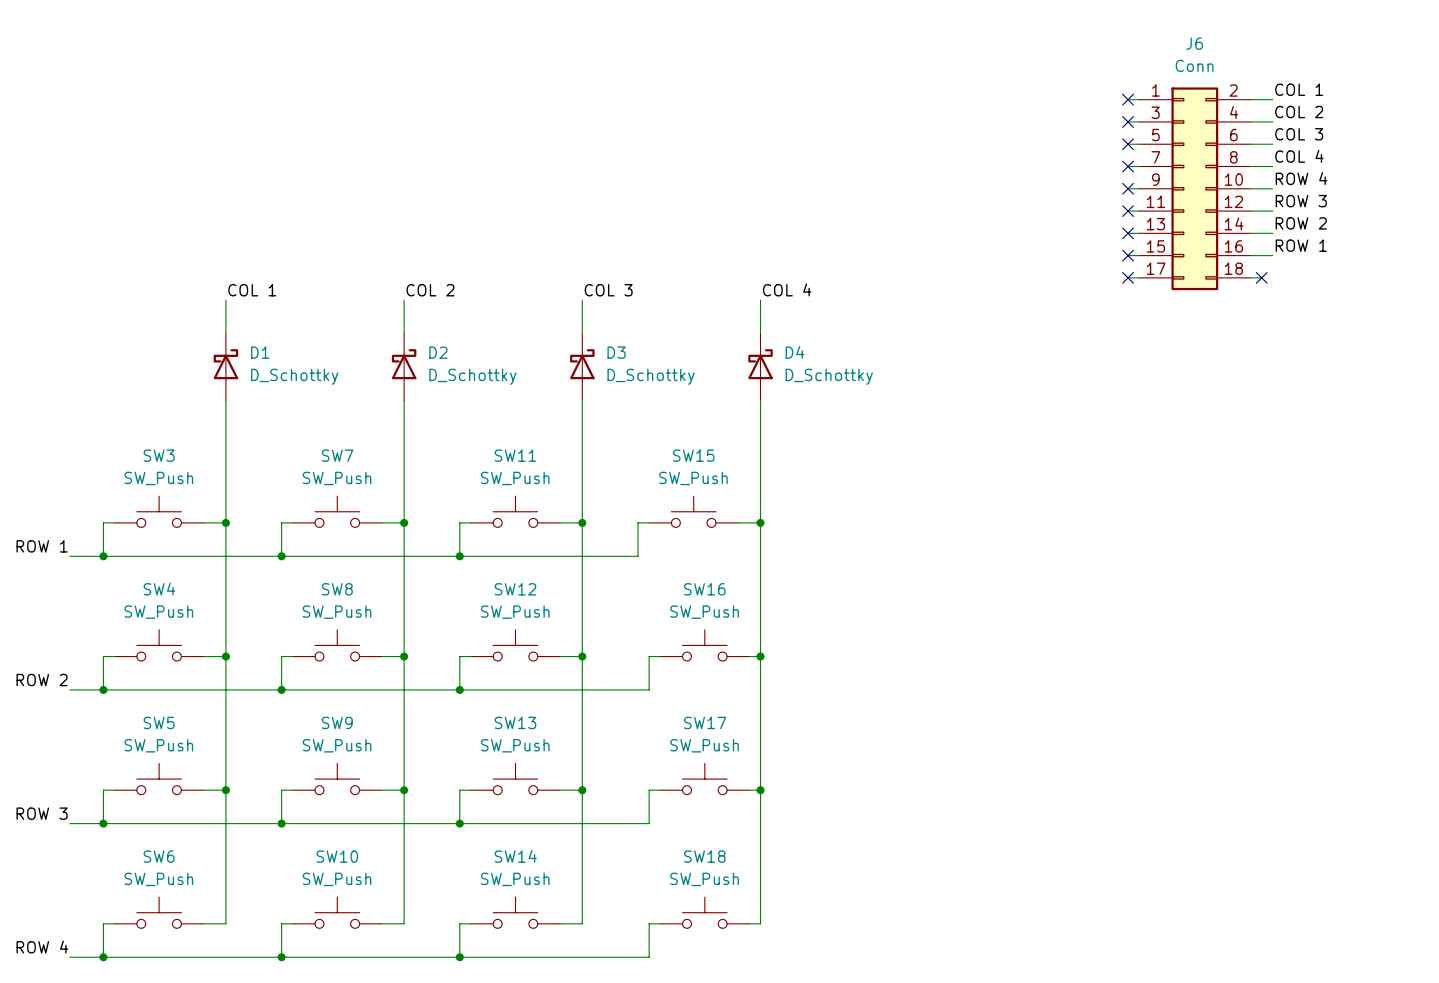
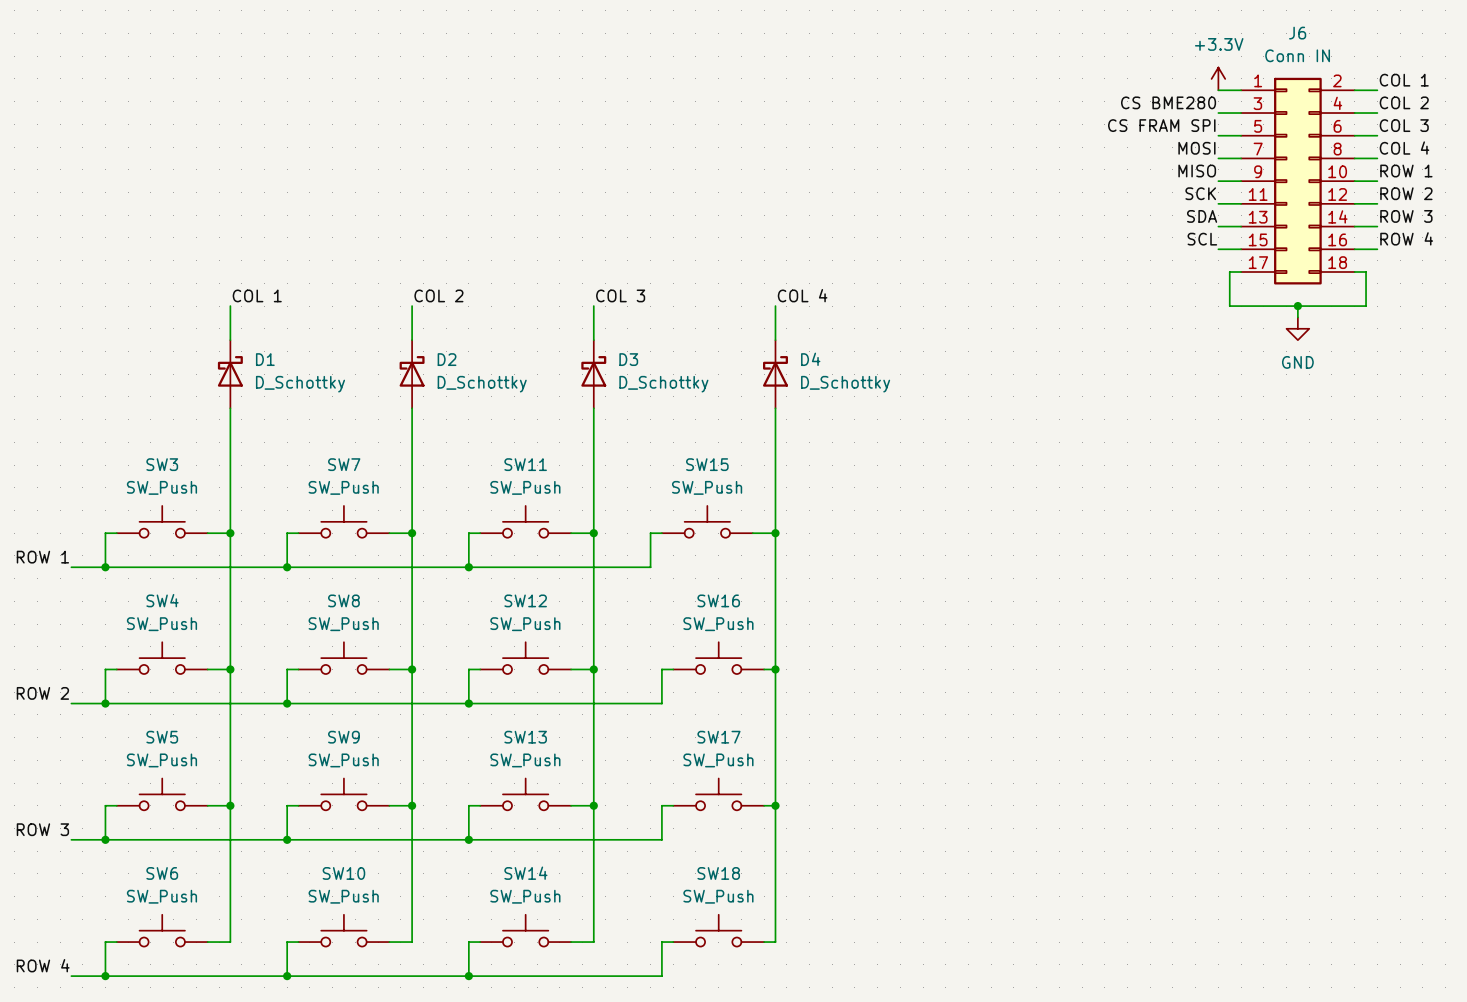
J6 value: Conn (1194, 65) -> Conn IN (1297, 55)
power symbol: none -> +3.3V (1218, 78)
wire: none -> (1354, 90) (1377, 90)
label position: COL 1 (1299, 89) -> COL 1 (1404, 80)
wire: (1128, 99) (1139, 99) -> none
no-connect mark: (1128, 99) -> none
label: none -> CS BME280 (1168, 102)
wire: none -> (1354, 113) (1377, 113)
label position: COL 2 (1299, 112) -> COL 2 (1404, 102)
wire: (1128, 121) (1139, 121) -> none
no-connect mark: (1128, 121) -> none
label: none -> CS FRAM SPI (1161, 125)
wire: none -> (1354, 135) (1377, 135)
label position: COL 3 (1299, 134) -> COL 3 (1404, 125)
wire: (1128, 144) (1139, 144) -> none
no-connect mark: (1128, 144) -> none
label: none -> MOSI (1196, 148)
wire: none -> (1354, 158) (1377, 158)
label position: COL 4 (1299, 156) -> COL 4 (1404, 148)
wire: (1128, 166) (1139, 166) -> none
no-connect mark: (1128, 166) -> none
label: none -> MISO (1197, 171)
wire: none -> (1354, 181) (1377, 181)
label position: ROW 4 (1301, 178) -> ROW 4 (1406, 238)
wire: (1128, 188) (1139, 188) -> none
no-connect mark: (1128, 188) -> none
J6 position: (1194, 188) -> (1297, 181)
label: none -> SCK (1200, 193)
wire: none -> (1354, 203) (1377, 203)
label position: ROW 3 (1301, 201) -> ROW 3 (1406, 216)
wire: (1128, 211) (1139, 211) -> none
no-connect mark: (1128, 211) -> none
label: none -> SDA (1202, 216)
wire: none -> (1354, 226) (1377, 226)
label position: ROW 2 (1301, 223) -> ROW 2 (1406, 193)
wire: (1128, 233) (1139, 233) -> none
no-connect mark: (1128, 233) -> none
label: none -> SCL (1202, 239)
wire: none -> (1354, 249) (1377, 249)
label position: ROW 1 (1301, 245) -> ROW 1 (1406, 171)
wire: (1128, 255) (1139, 255) -> none
no-connect mark: (1128, 255) -> none
wire: none -> (1241, 272) (1229, 272) (1229, 306) (1366, 306) (1366, 272) (1354, 272)
wire: (1128, 277) (1139, 277) -> none
no-connect mark: (1128, 277) -> none
no-connect mark: (1261, 277) -> none
wire: none -> (1297, 306) (1297, 317)
junction: none -> (1297, 306)
power symbol: none -> GND (1297, 328)

